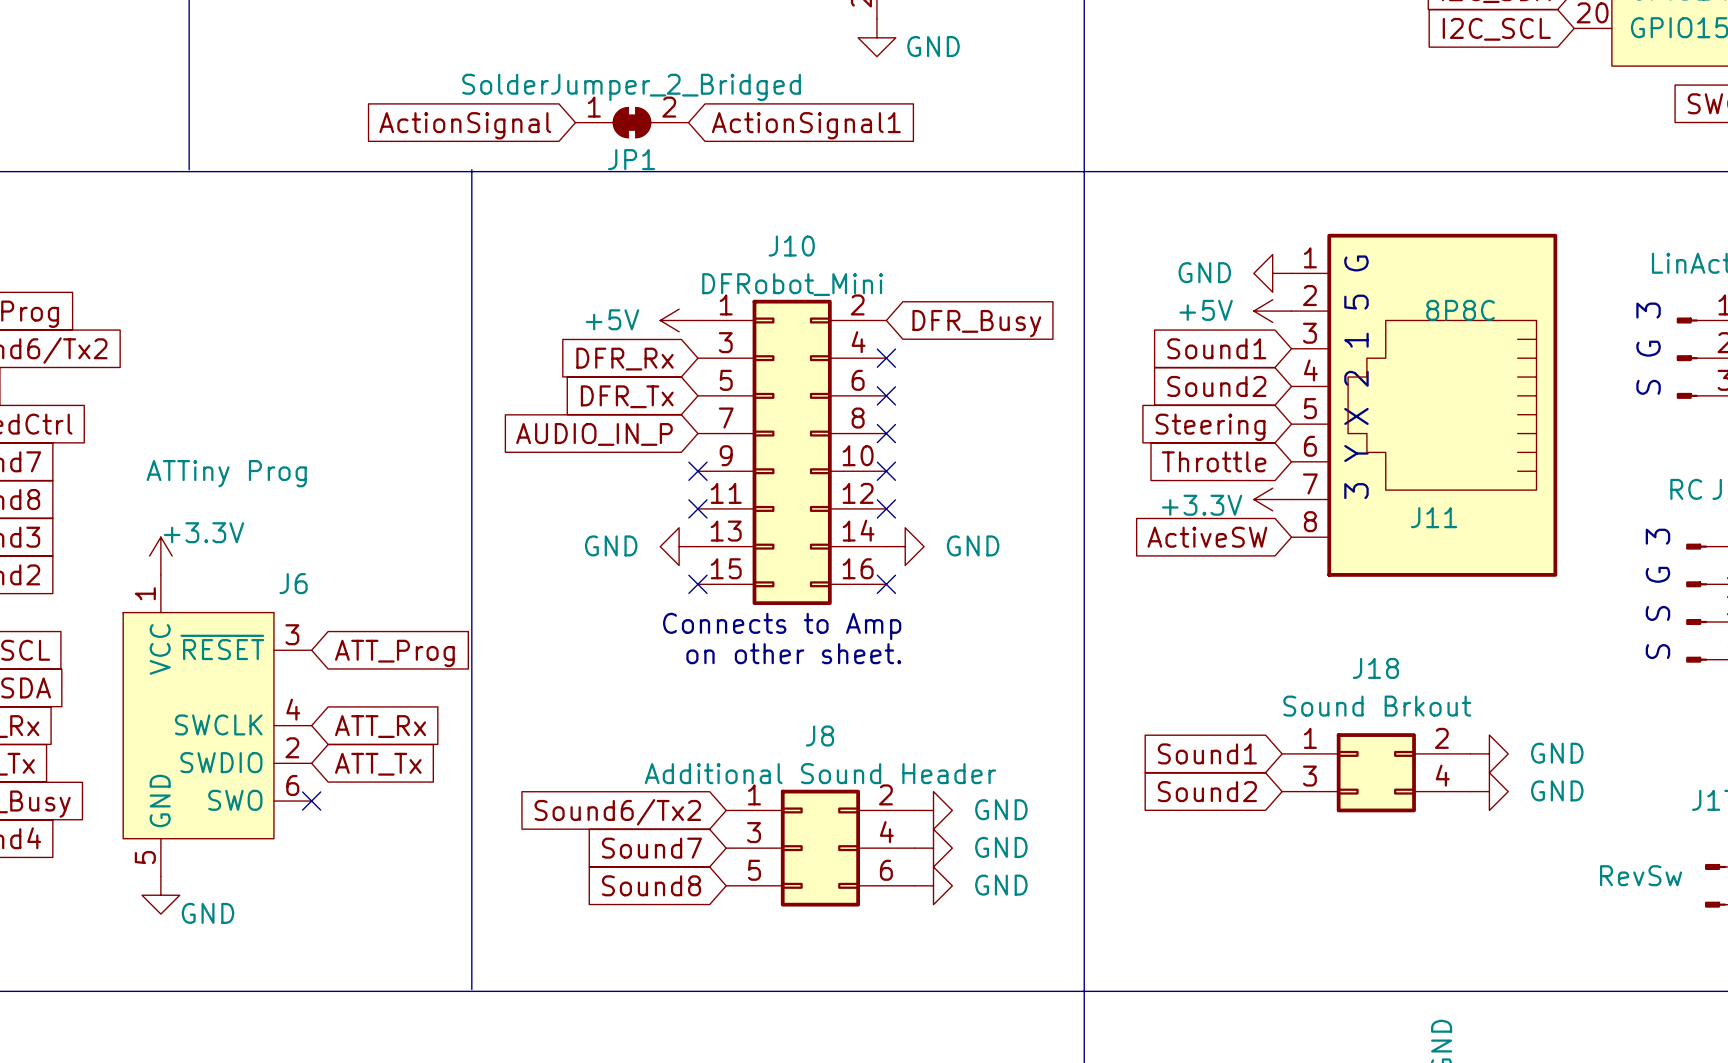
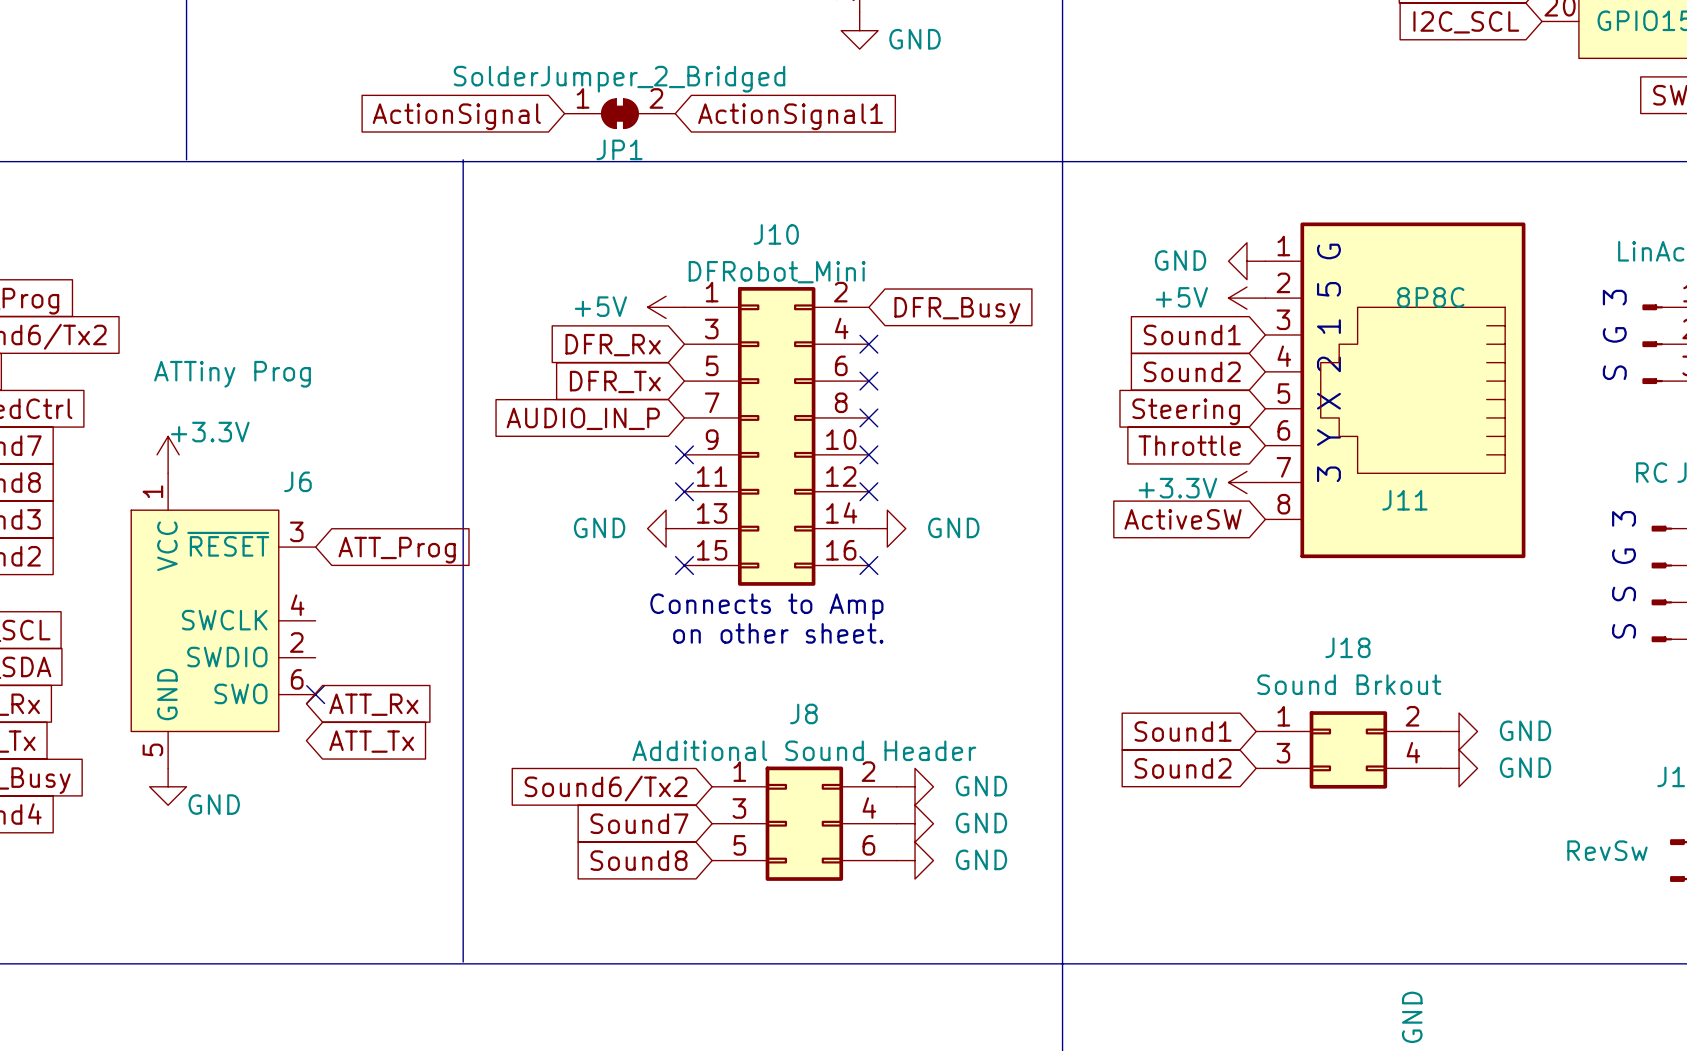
power symbol position: +3.3V (160, 556) -> +3.3V (168, 454)
global label position: ATT_Prog (394, 653) -> ATT_Prog (397, 550)
J6 position: (217, 725) -> (223, 620)
no-connect mark position: (311, 801) -> (315, 694)
power symbol position: GND (160, 895) -> GND (168, 786)

